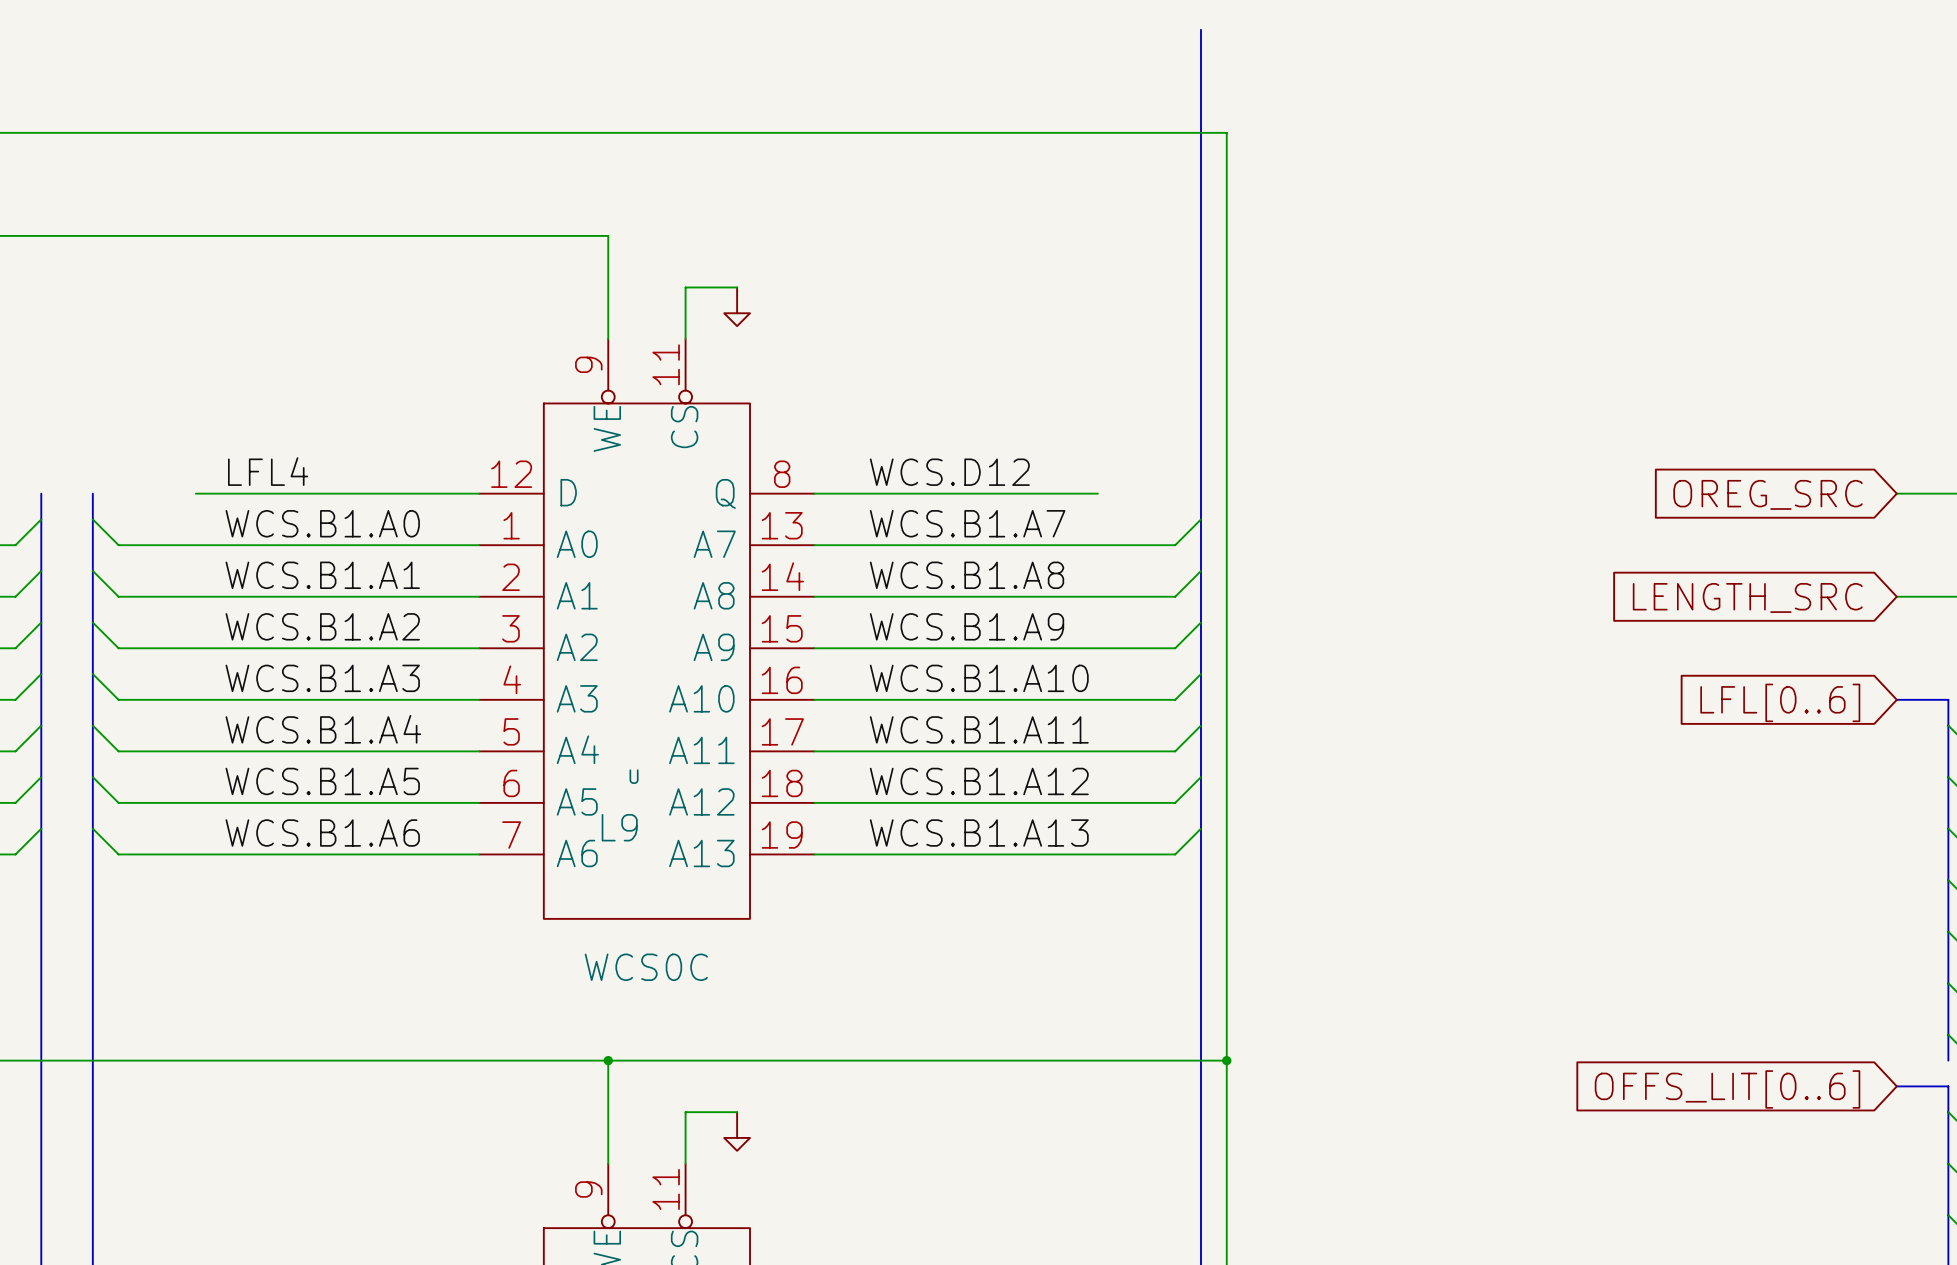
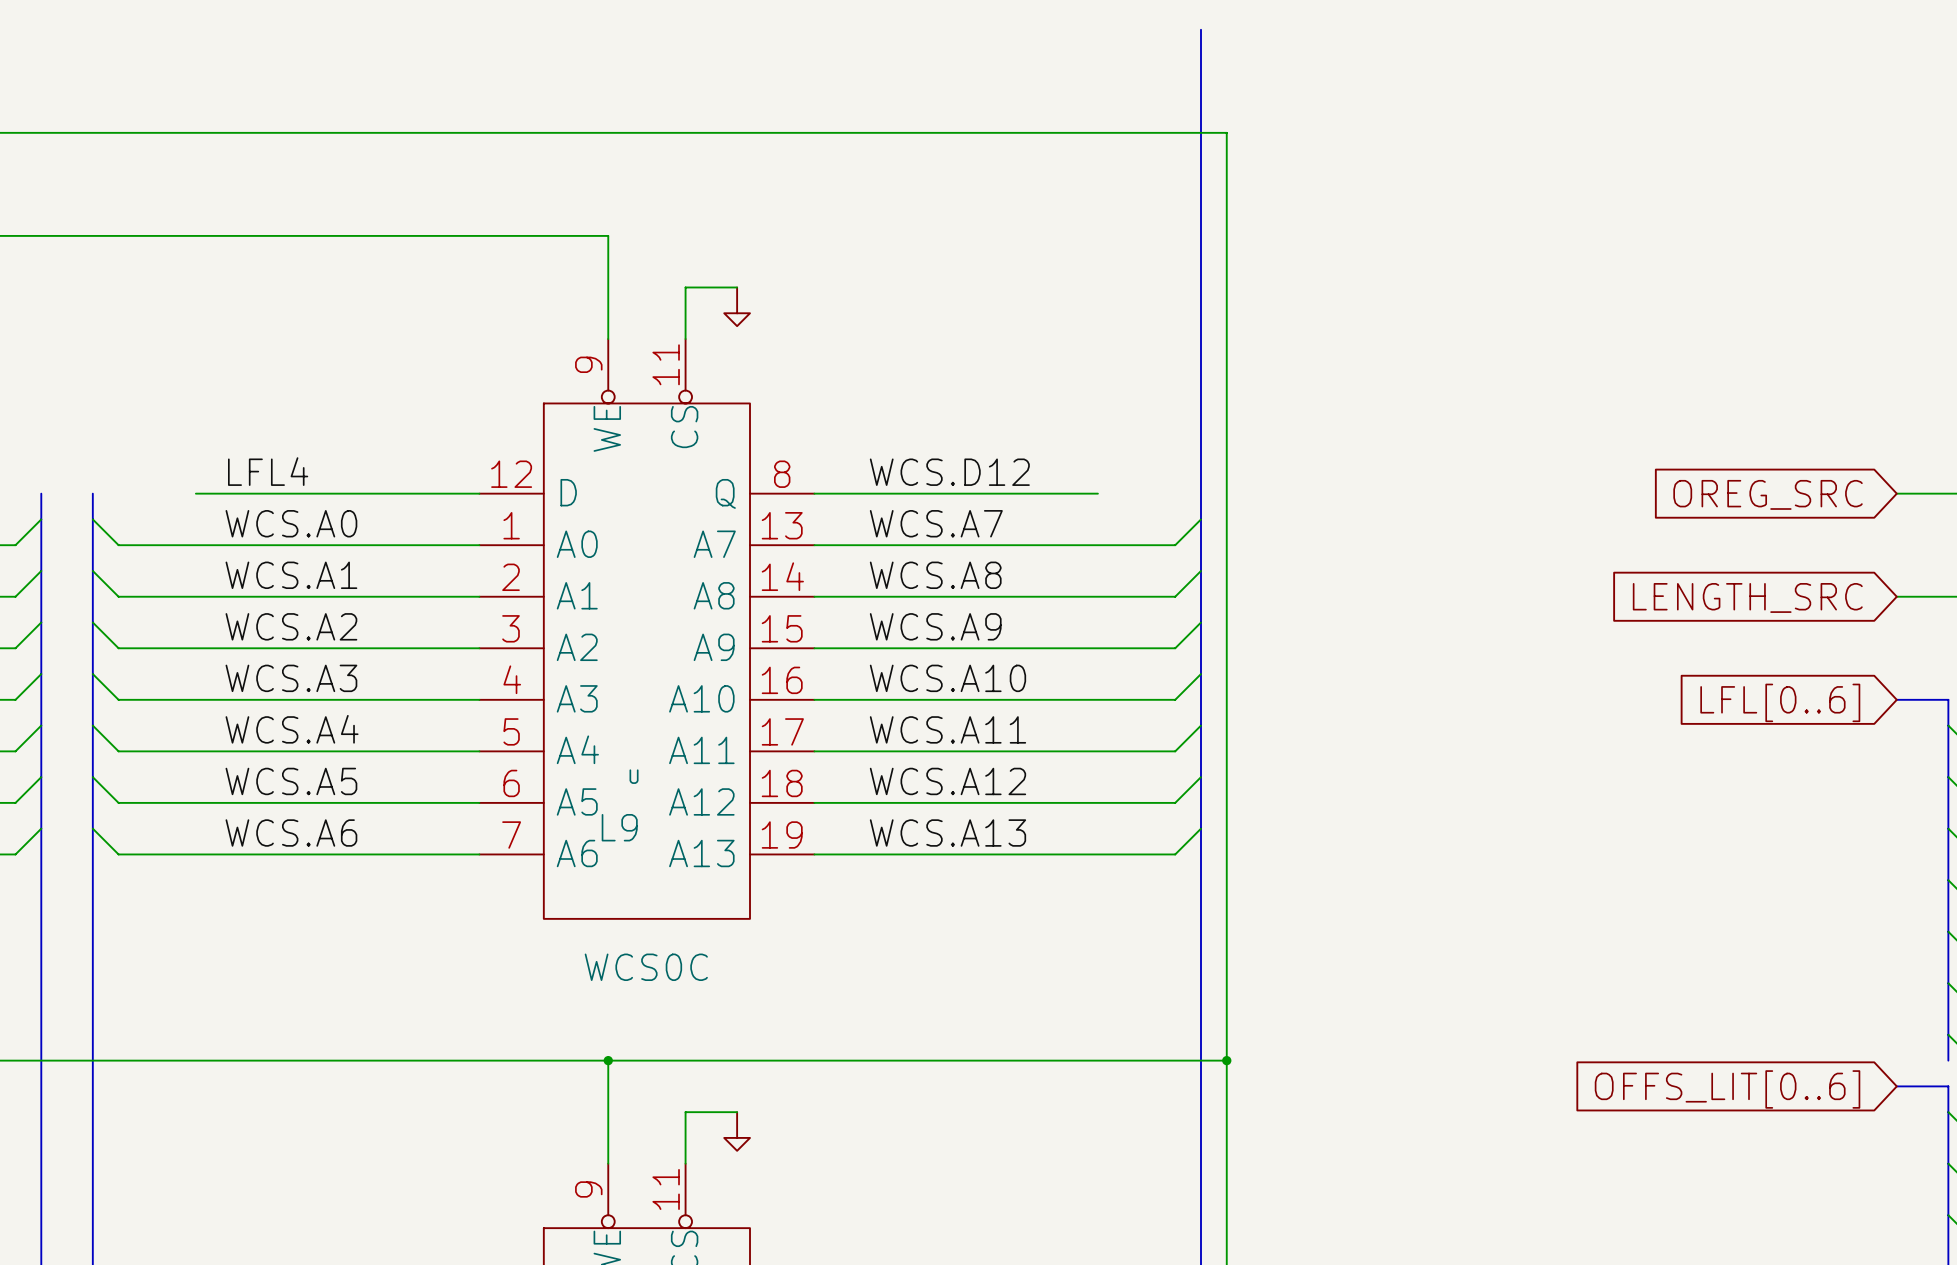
label: WCS.B1.A0 (322, 523) -> WCS.A0 (291, 523)
label: WCS.B1.A7 (967, 523) -> WCS.A7 (936, 523)
label: WCS.B1.A1 (322, 575) -> WCS.A1 (291, 575)
label: WCS.B1.A8 (967, 575) -> WCS.A8 (935, 575)
label: WCS.B1.A2 (322, 626) -> WCS.A2 (291, 626)
label: WCS.B1.A9 (967, 626) -> WCS.A9 (935, 626)
label: WCS.B1.A3 (322, 678) -> WCS.A3 (291, 678)
label: WCS.B1.A10 (979, 678) -> WCS.A10 (947, 678)
label: WCS.B1.A4 (323, 729) -> WCS.A4 (292, 729)
label: WCS.B1.A11 (979, 729) -> WCS.A11 (947, 729)
label: WCS.B1.A5 (322, 781) -> WCS.A5 (291, 781)
label: WCS.B1.A12 (979, 781) -> WCS.A12 (947, 781)
label: WCS.B1.A6 (322, 833) -> WCS.A6 (291, 833)
label: WCS.B1.A13 (979, 833) -> WCS.A13 (947, 833)

